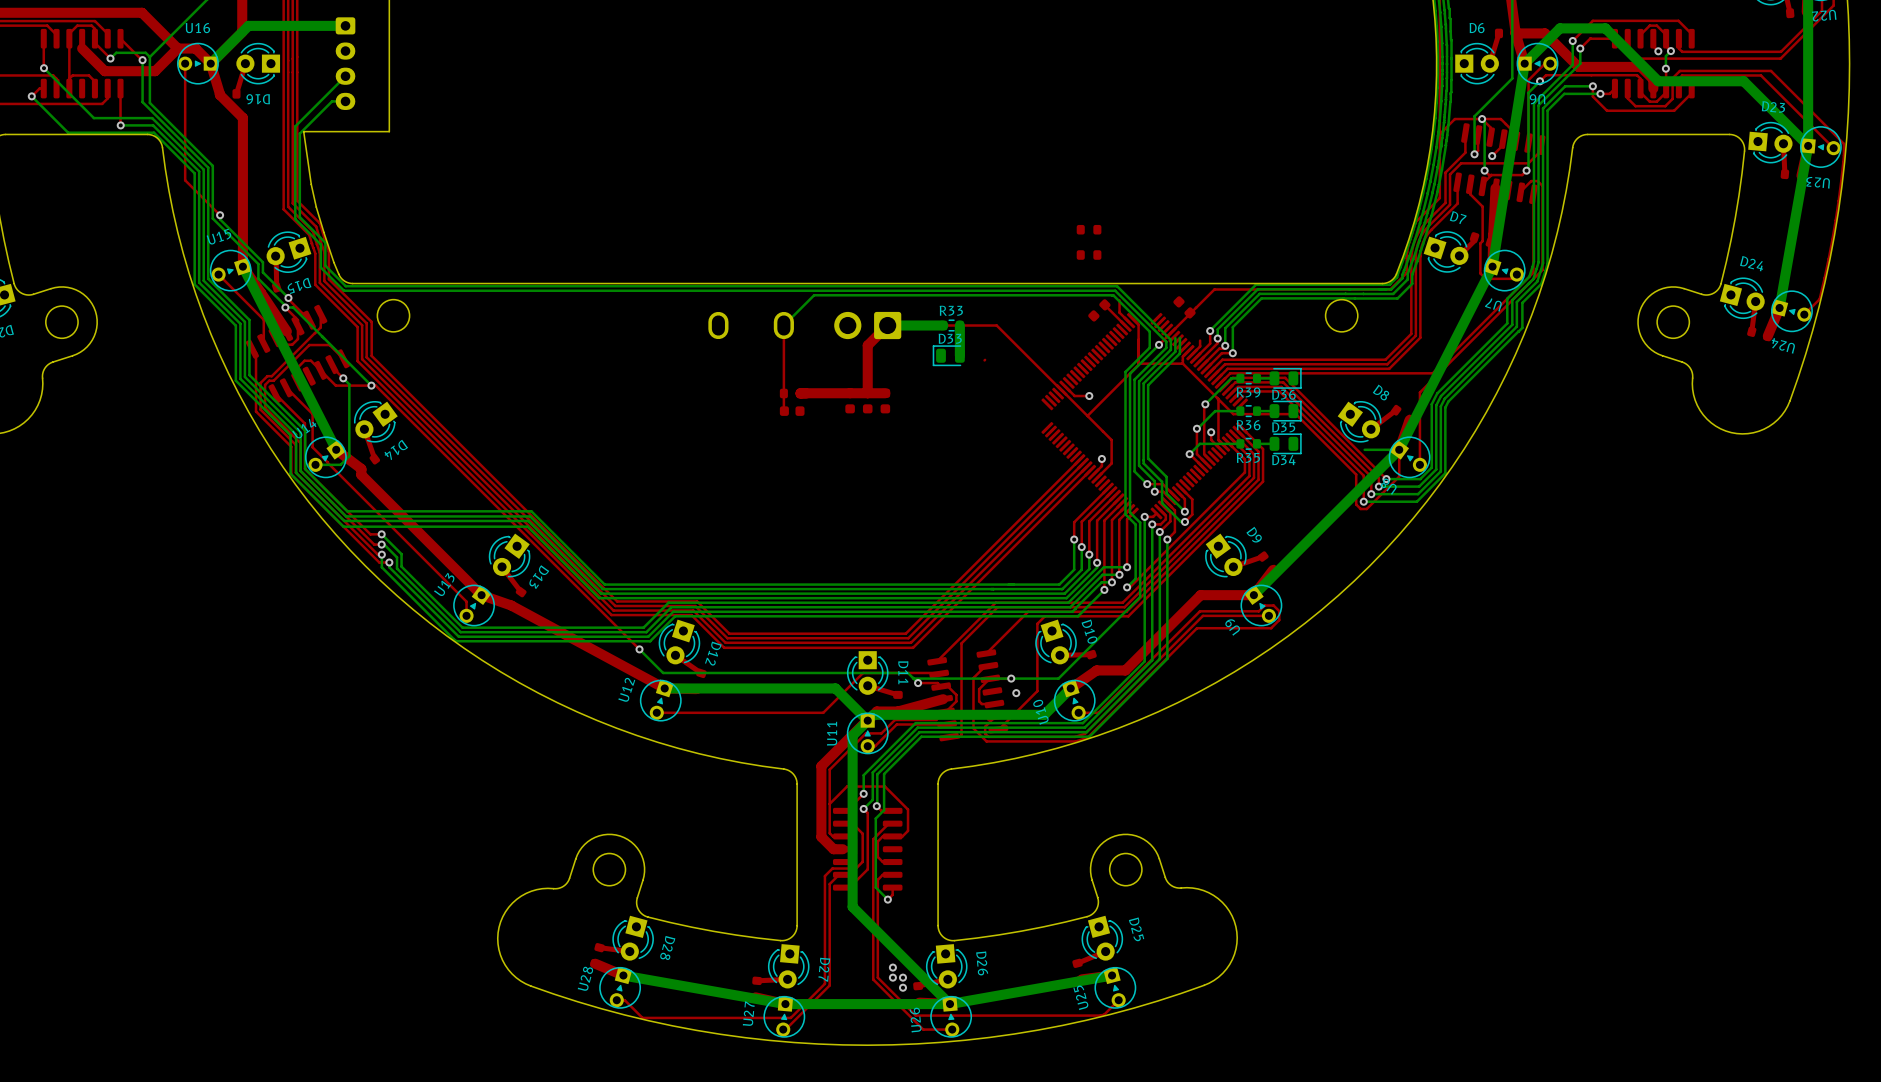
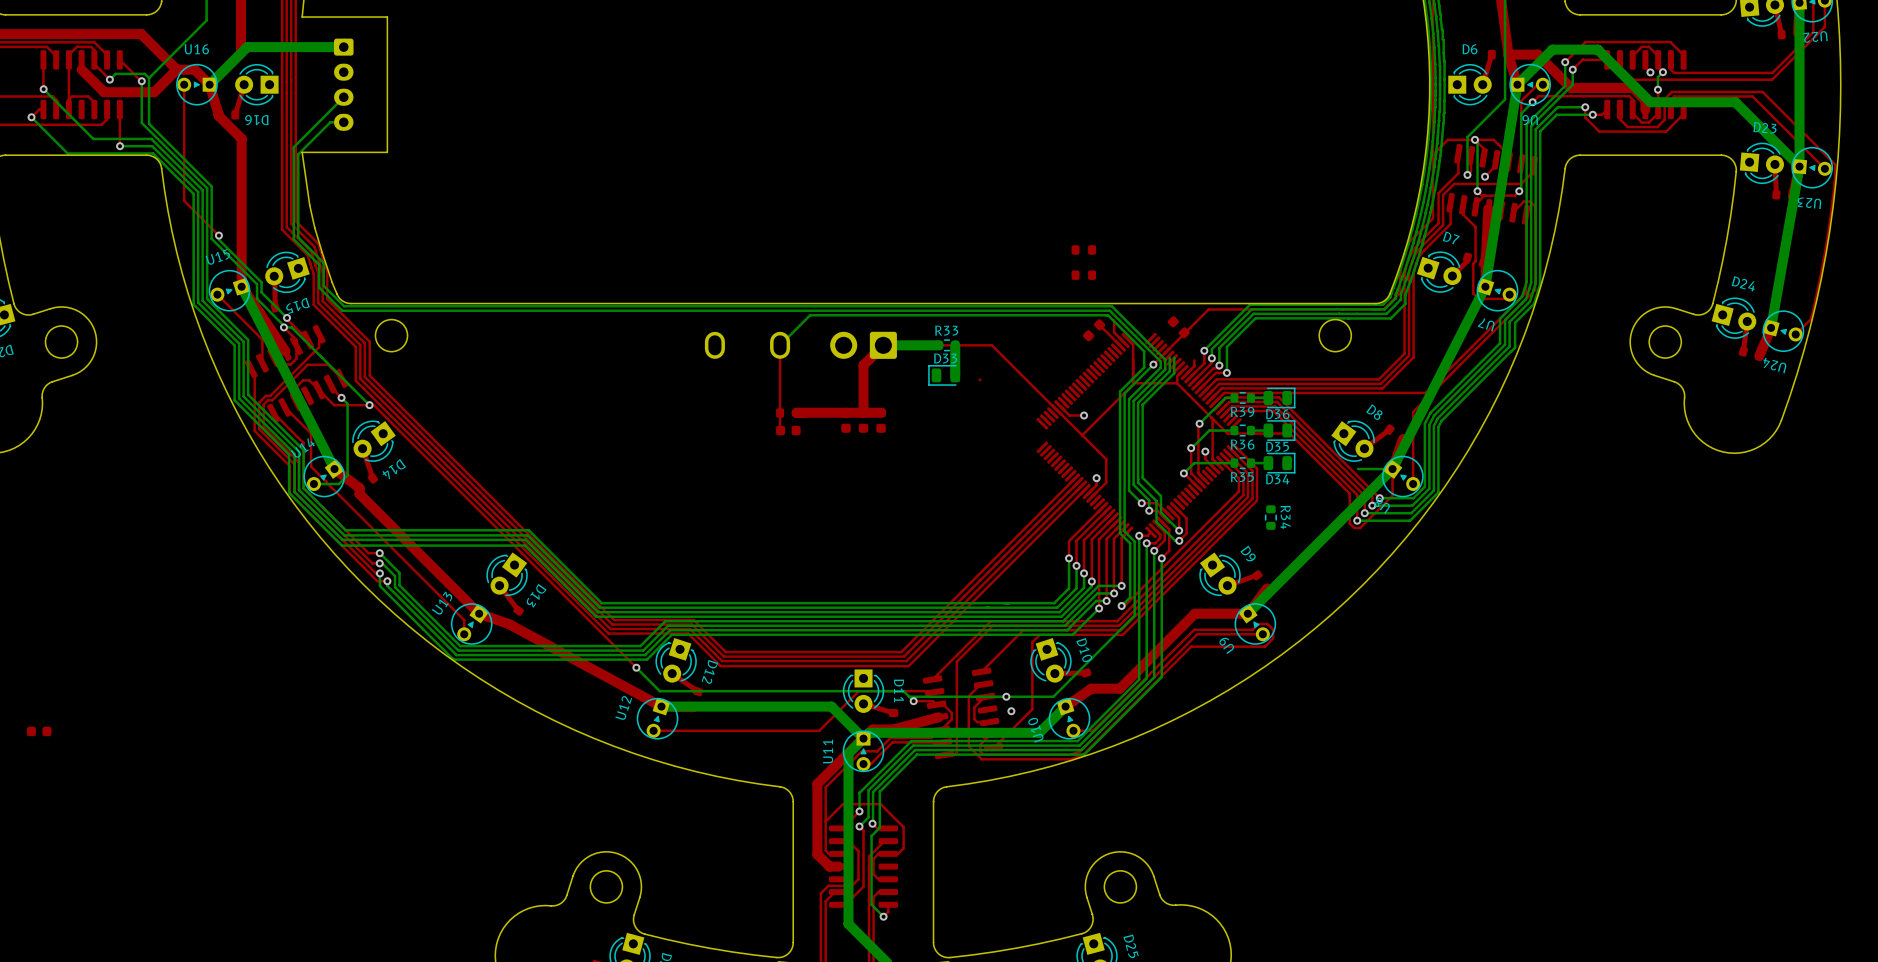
R34: none -> (1270, 517)
part: none -> (39, 731)

